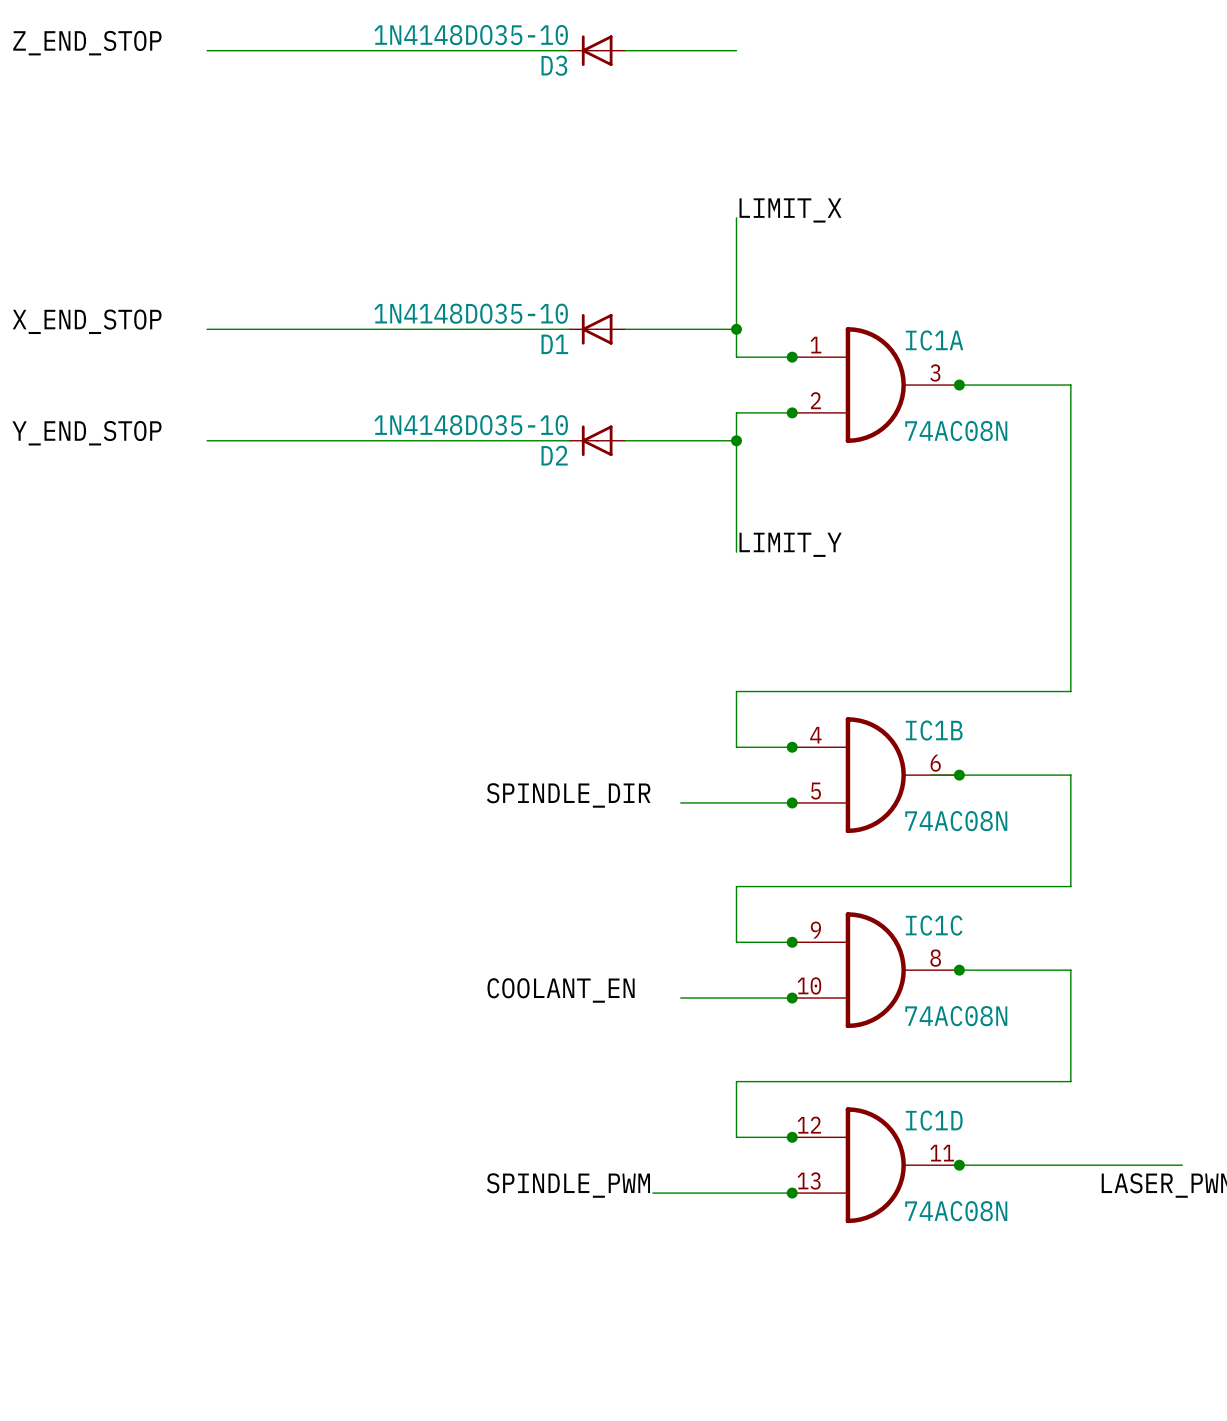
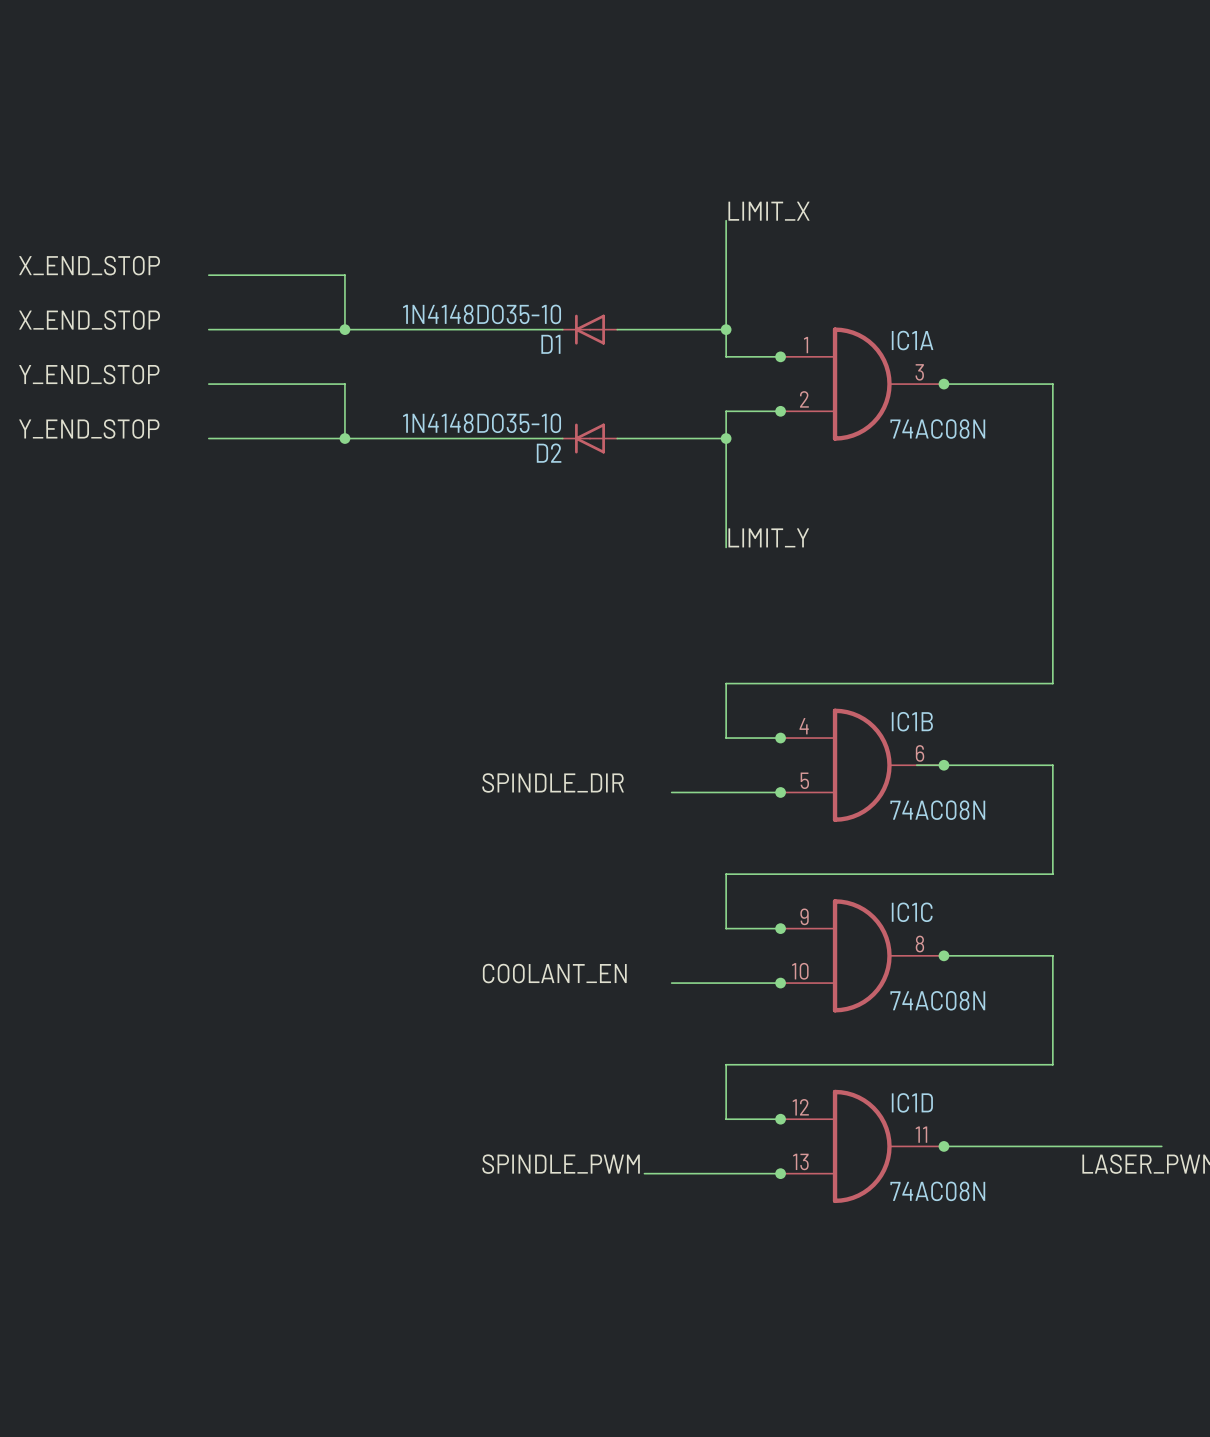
label: Z_END_STOP (87, 43) -> none
wire: (207, 50) (569, 50) -> none
D3: 1N4148DO35-10 (597, 50) -> none
wire: (625, 50) (736, 50) -> none
label: none -> X_END_STOP (89, 265)
wire: none -> (208, 275) (344, 275) (344, 329)
junction: none -> (344, 329)
label: none -> Y_END_STOP (89, 374)
wire: none -> (208, 384) (344, 384) (344, 438)
junction: none -> (344, 438)

